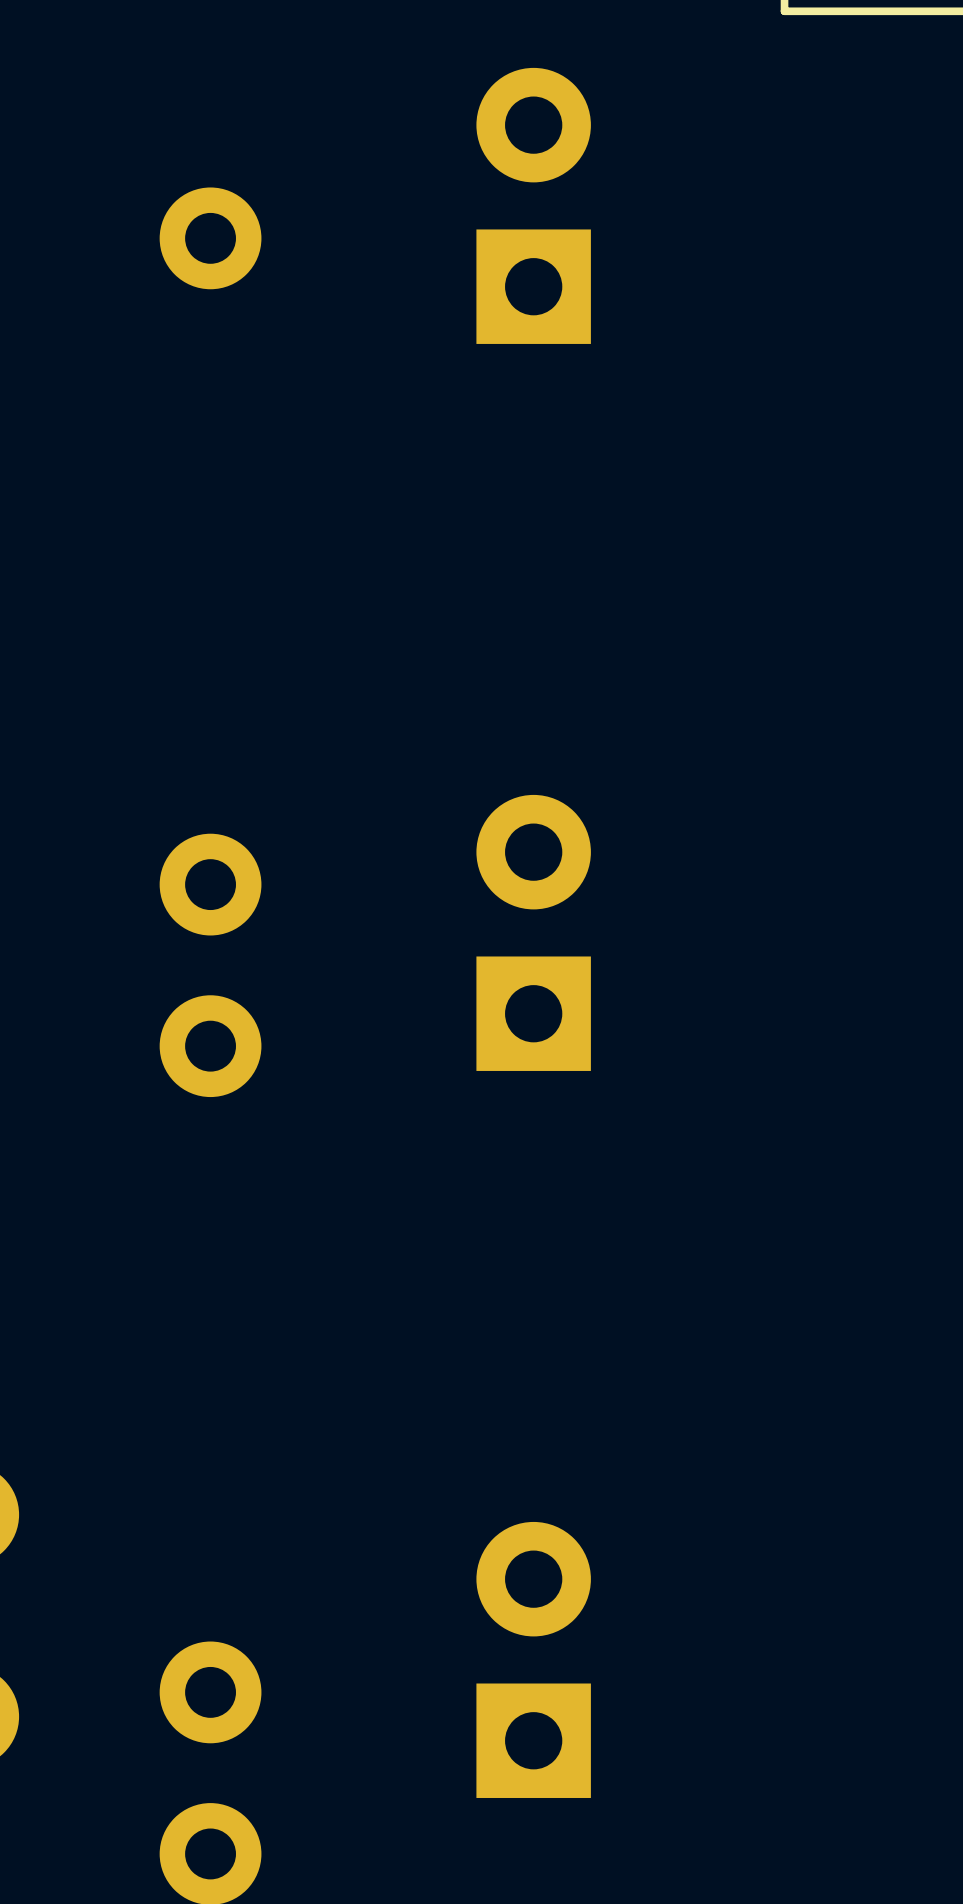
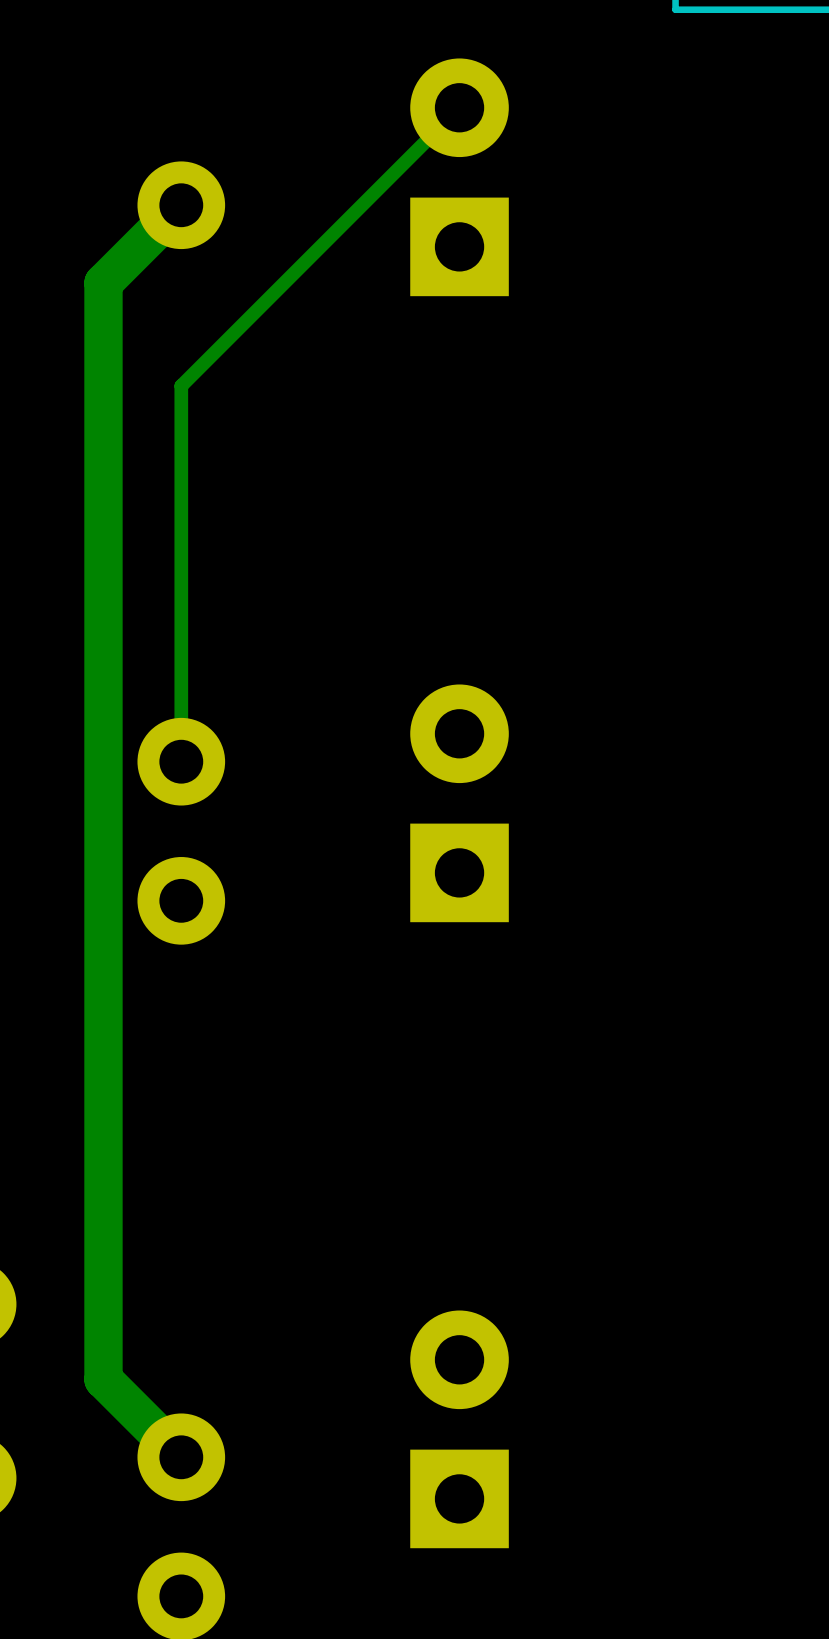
track: none -> (459, 107) (181, 385) (181, 761)
track: none -> (181, 205) (103, 283) (103, 1379) (181, 1457)

